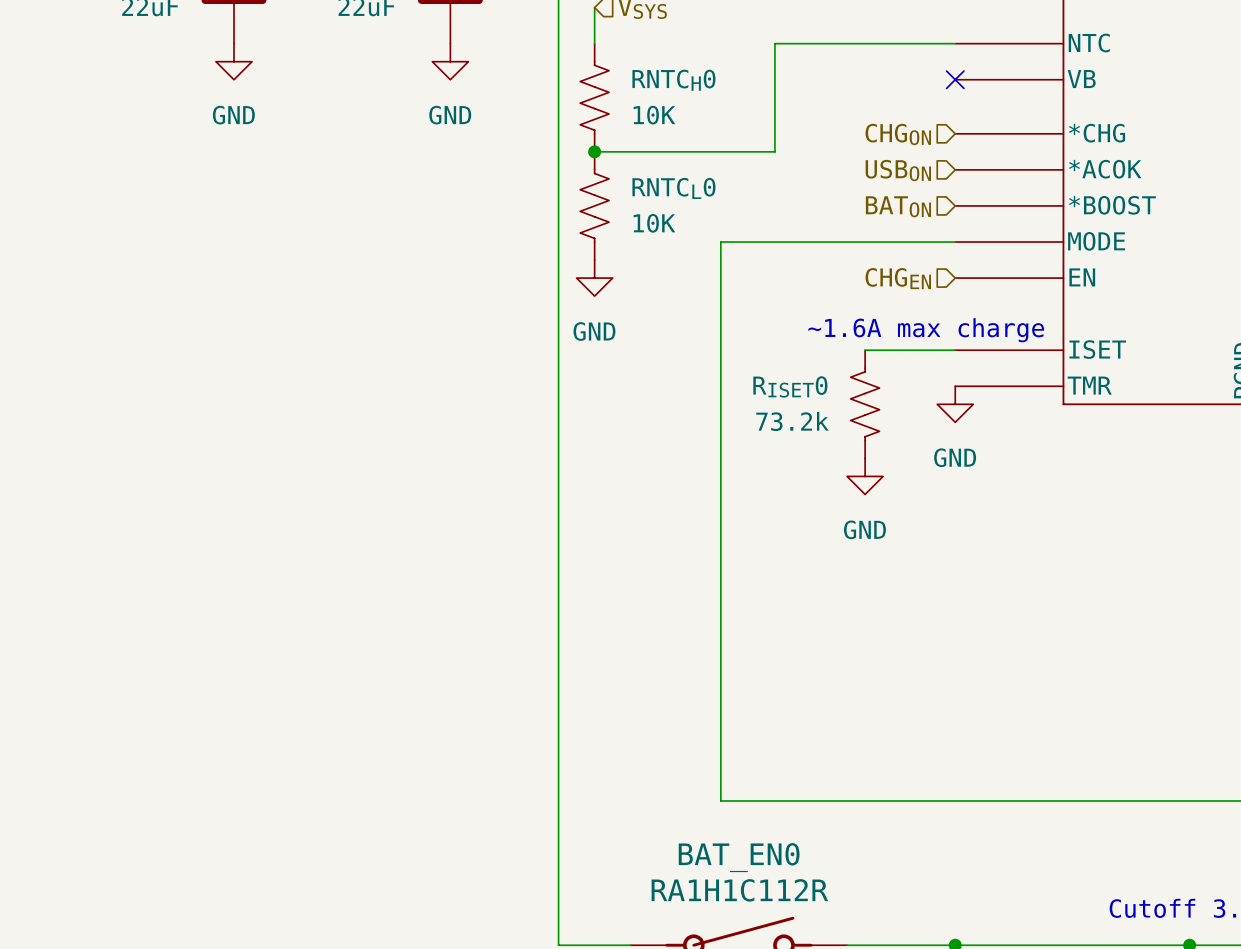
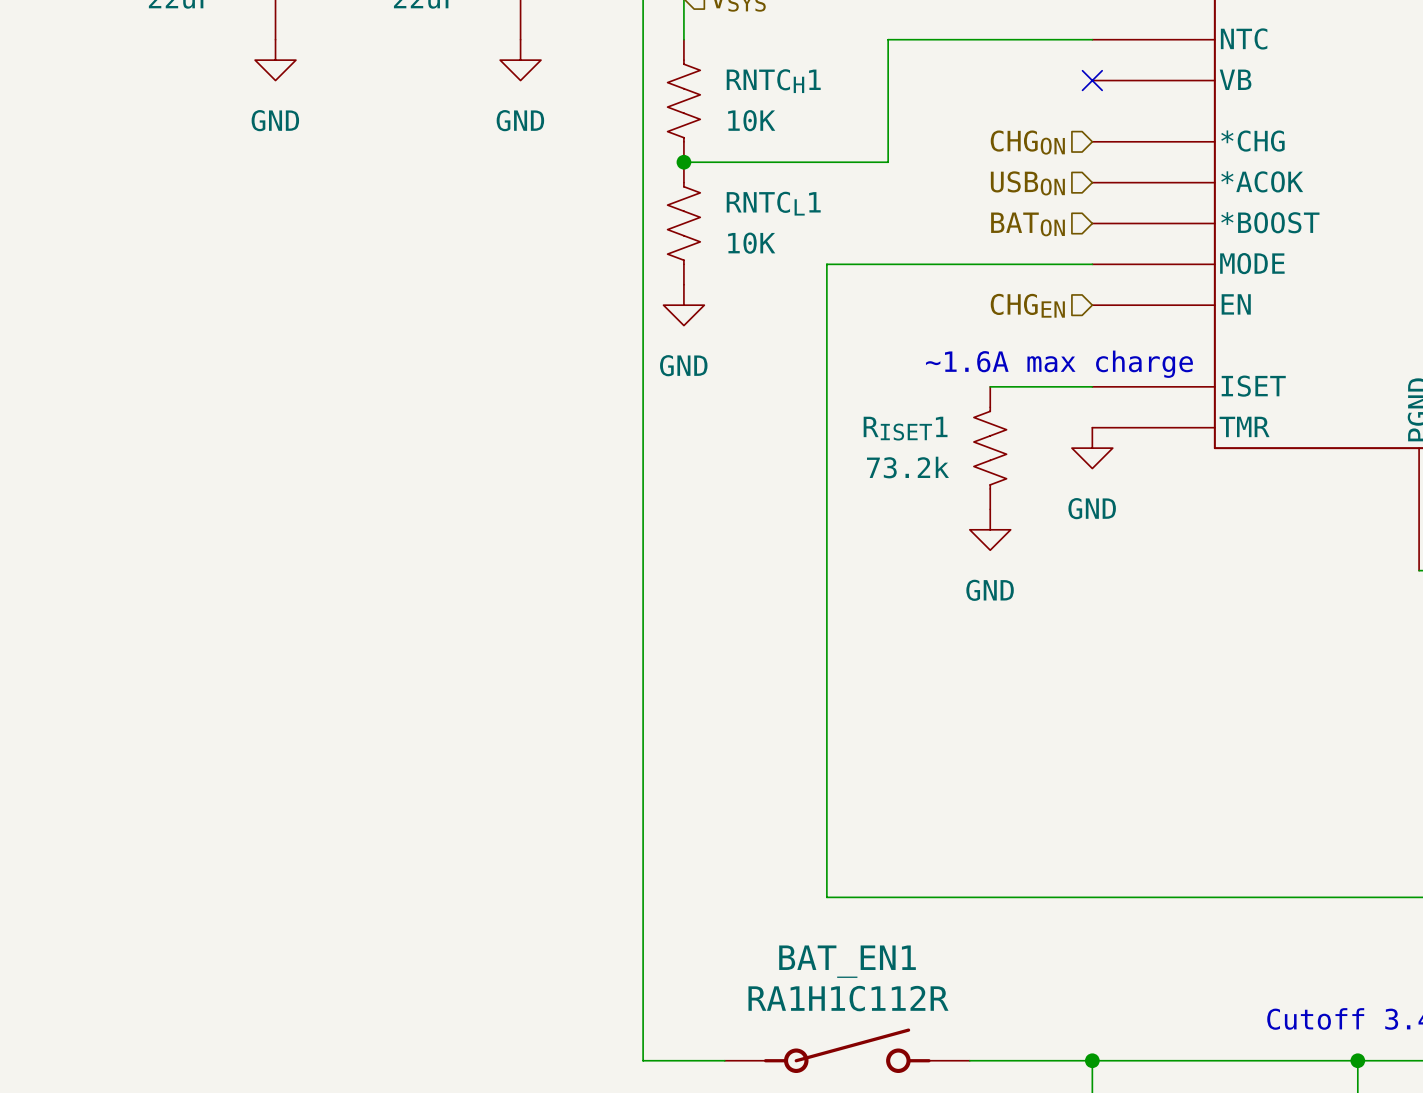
RNTCH0 name: RNTCH0 (673, 80) -> RNTCH1 (773, 81)
RNTCL0 name: RNTCL0 (673, 188) -> RNTCL1 (773, 203)
RISET0 name: RISET0 (790, 386) -> RISET1 (905, 428)
BAT_EN0 name: BAT_EN0 (739, 857) -> BAT_EN1 (847, 961)

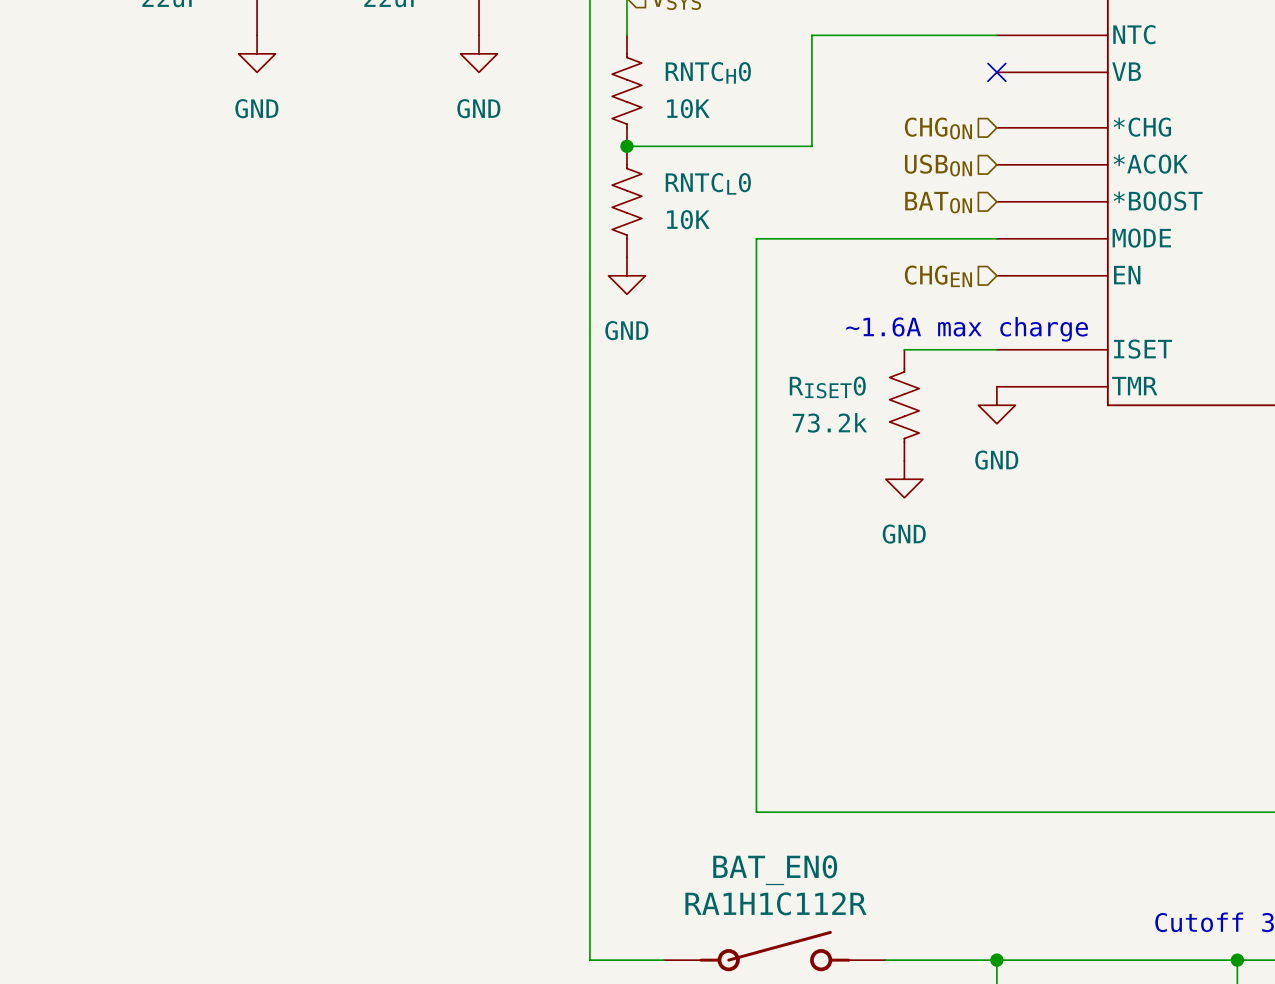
RNTCH1 name: RNTCH1 (773, 81) -> RNTCH0 (708, 72)
RNTCL1 name: RNTCL1 (773, 203) -> RNTCL0 (708, 183)
RISET1 name: RISET1 (905, 428) -> RISET0 (827, 387)
BAT_EN1 name: BAT_EN1 (847, 961) -> BAT_EN0 (775, 870)

